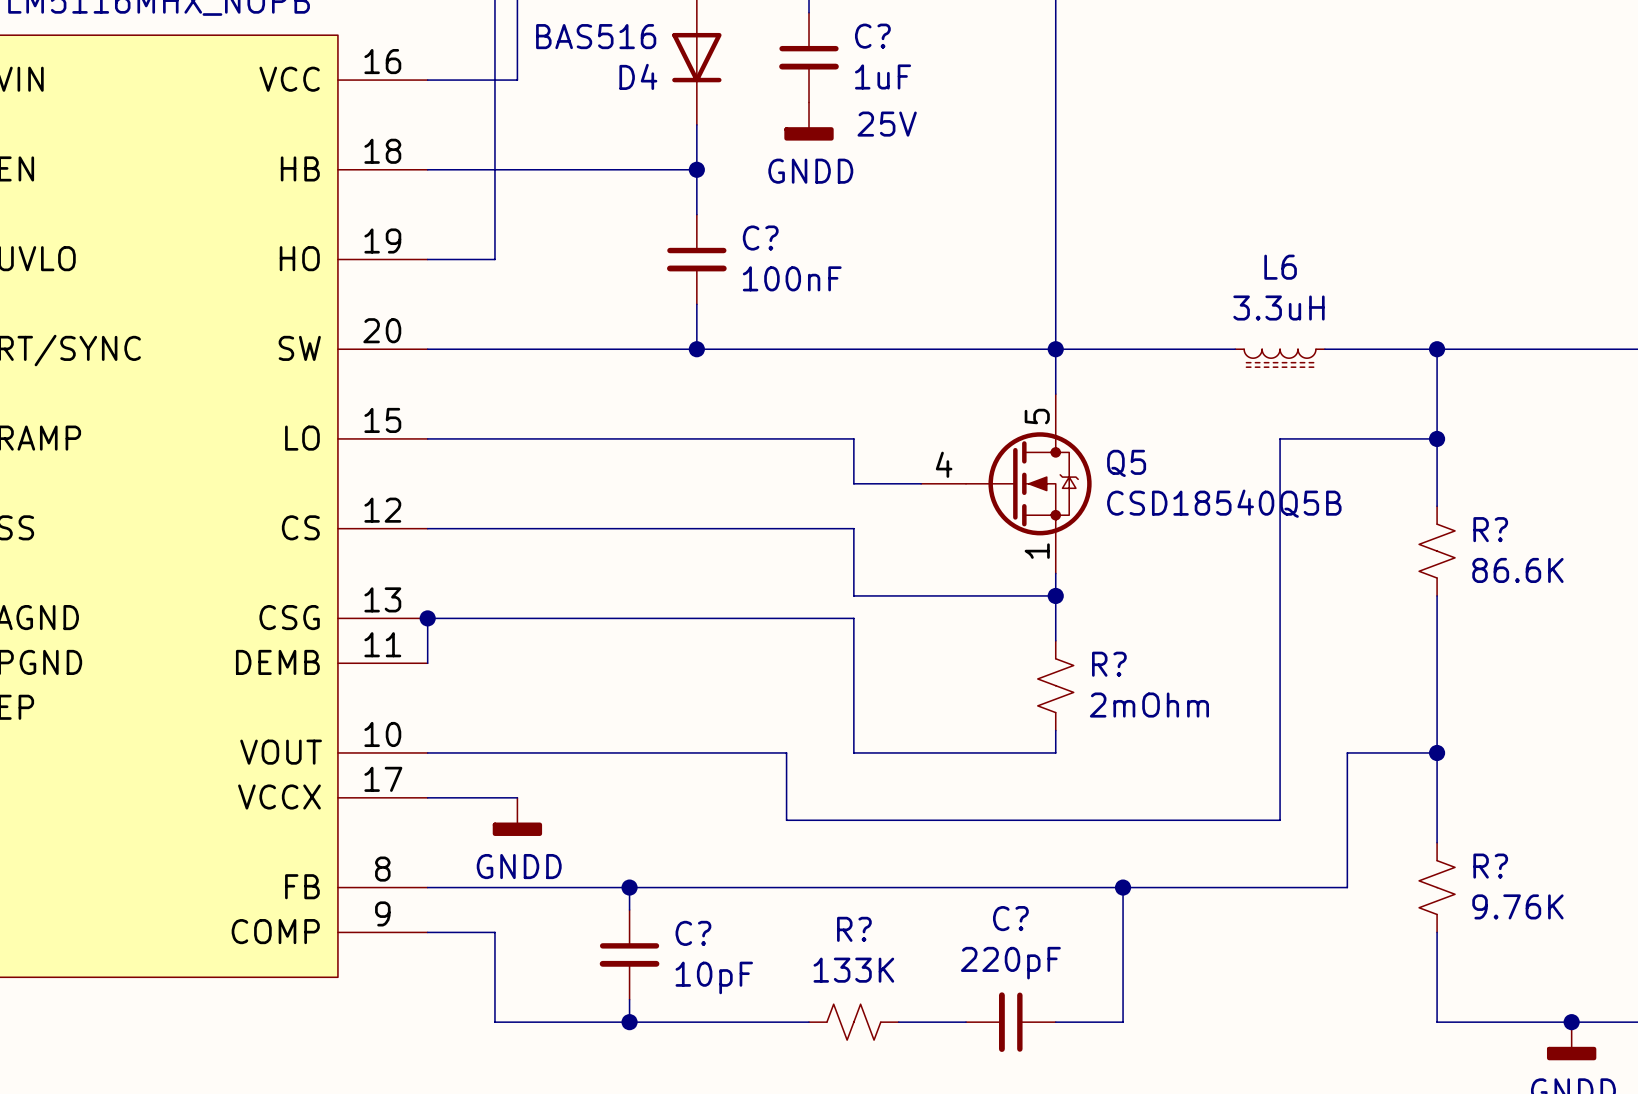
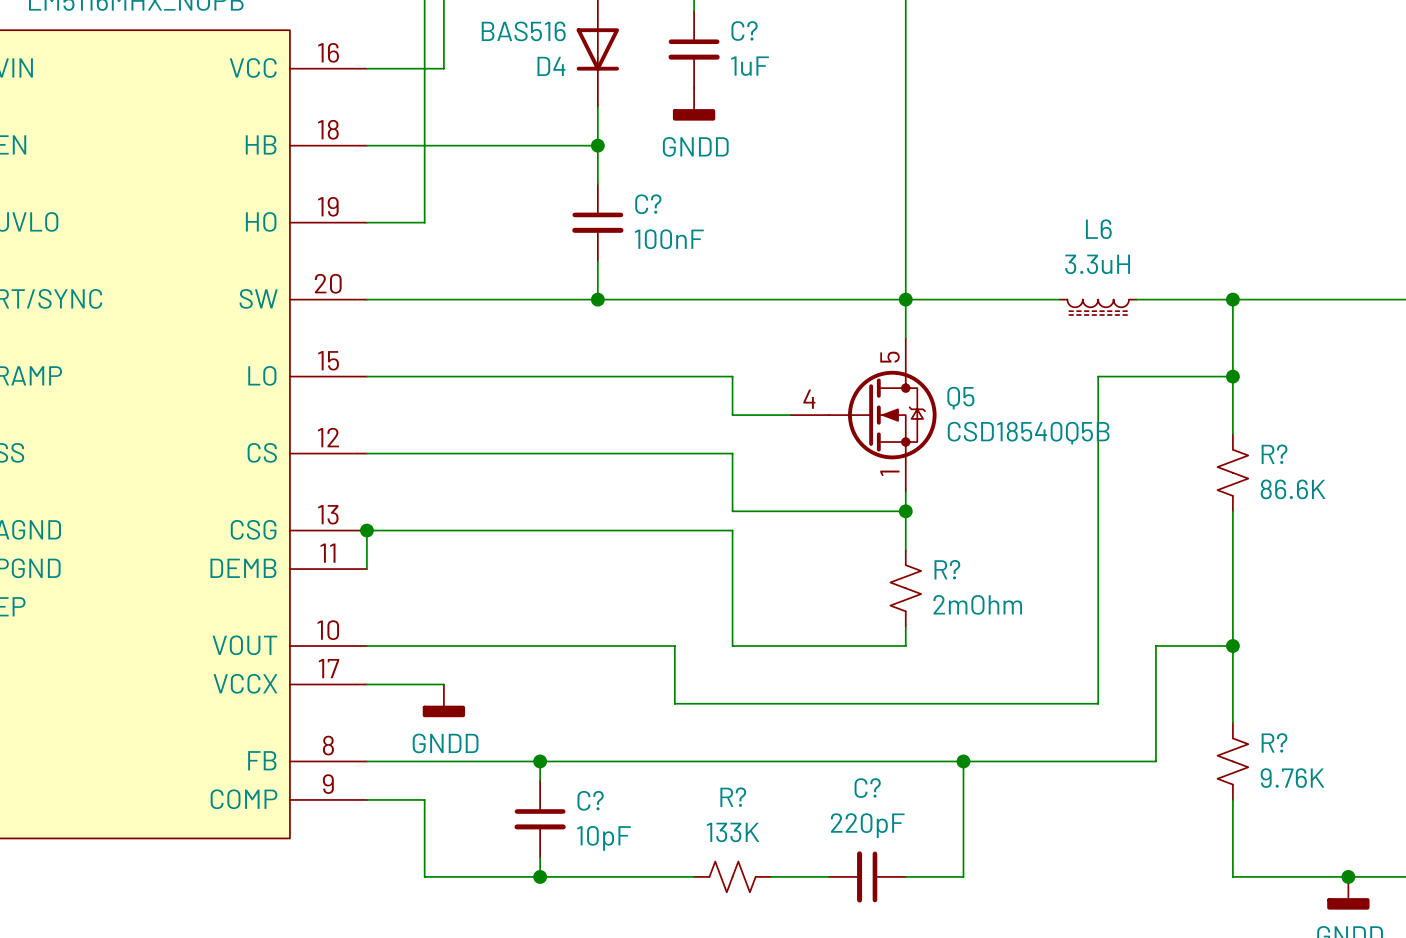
C? text: 25V (887, 124) -> none

